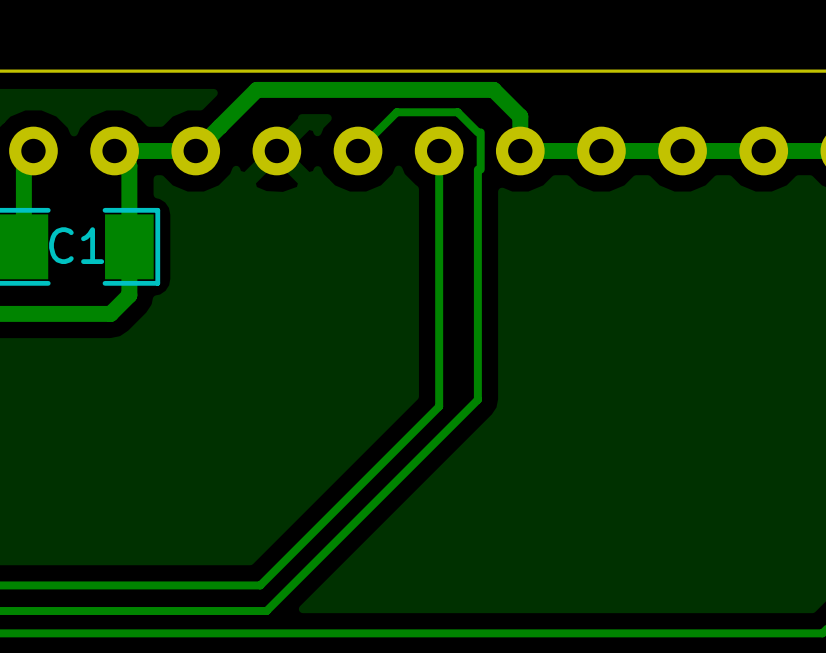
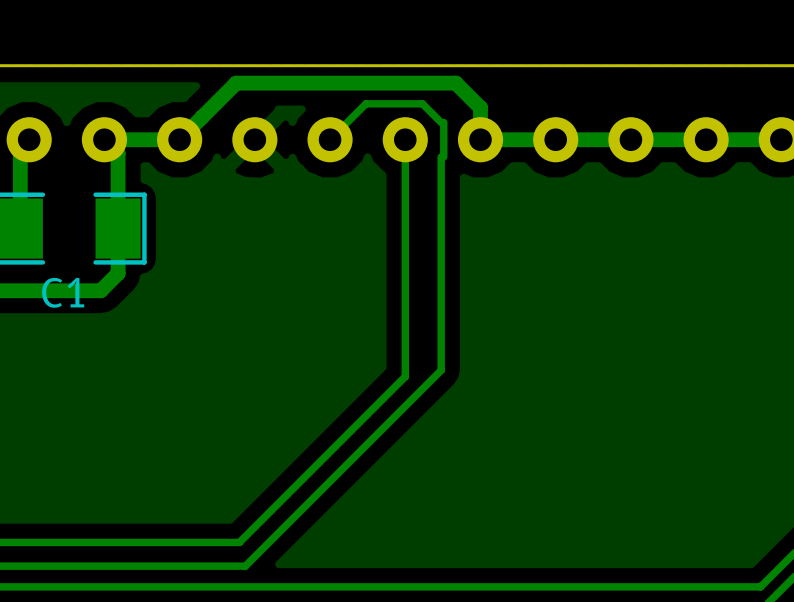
C1 name position: C1 (76, 245) -> C1 (63, 292)

